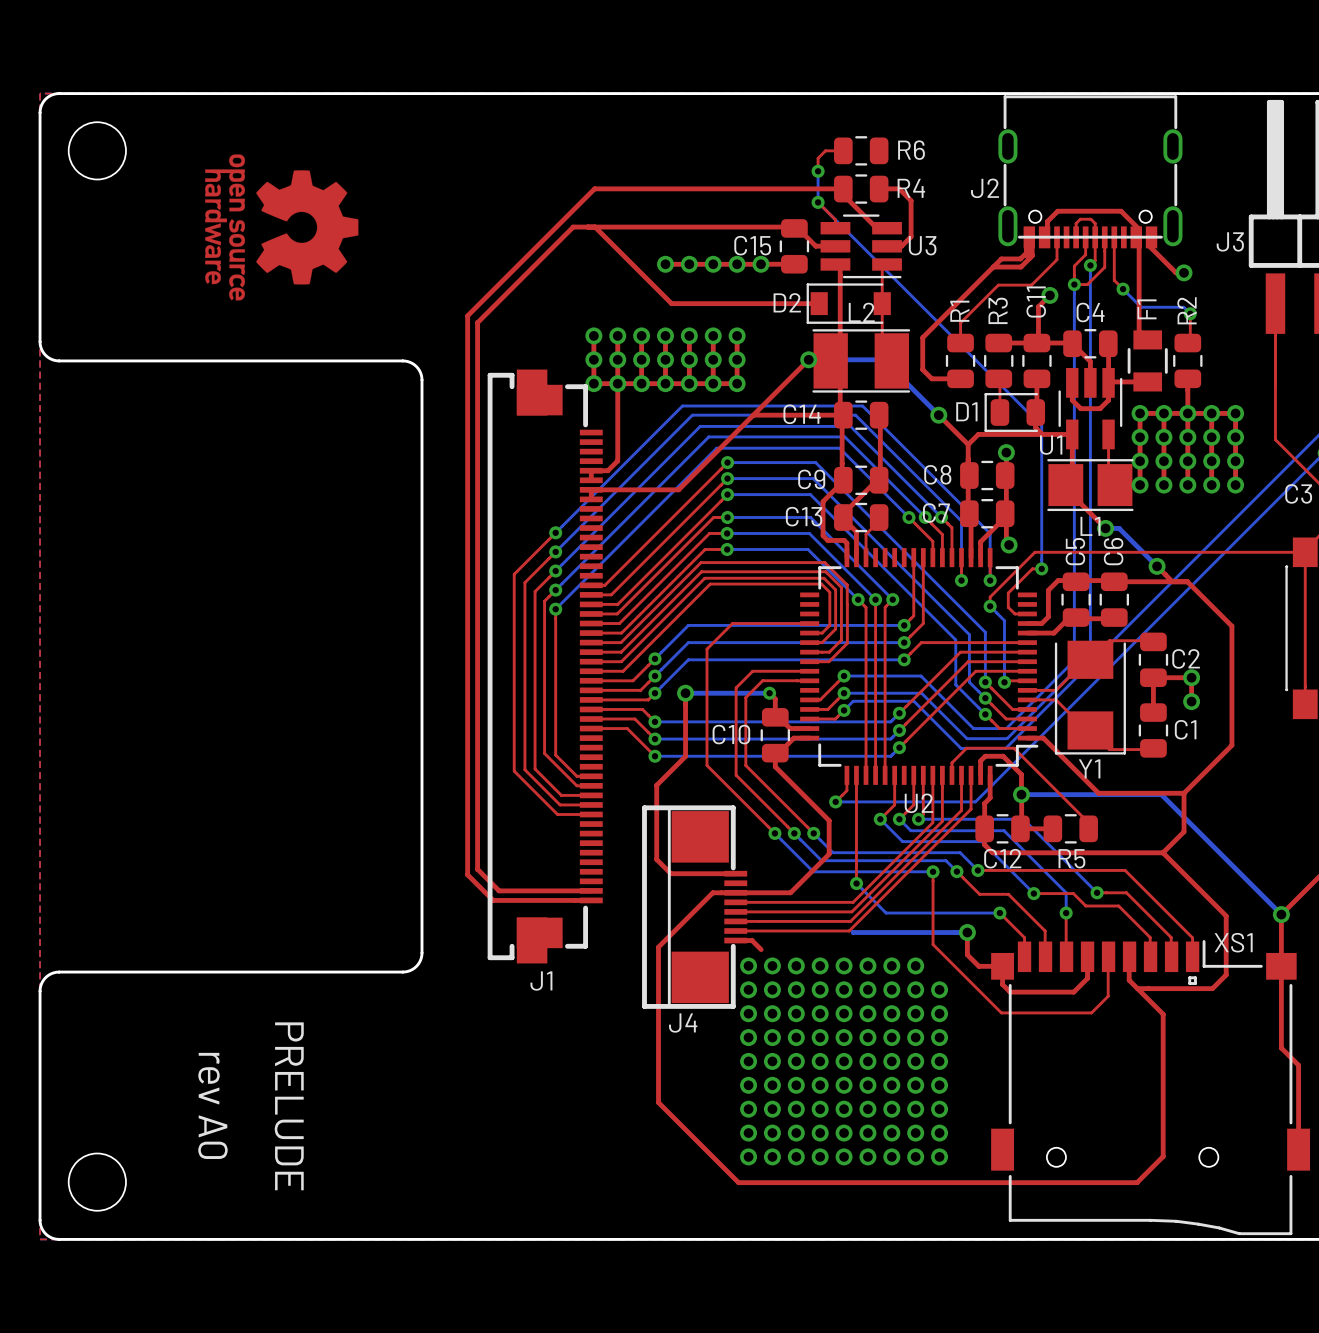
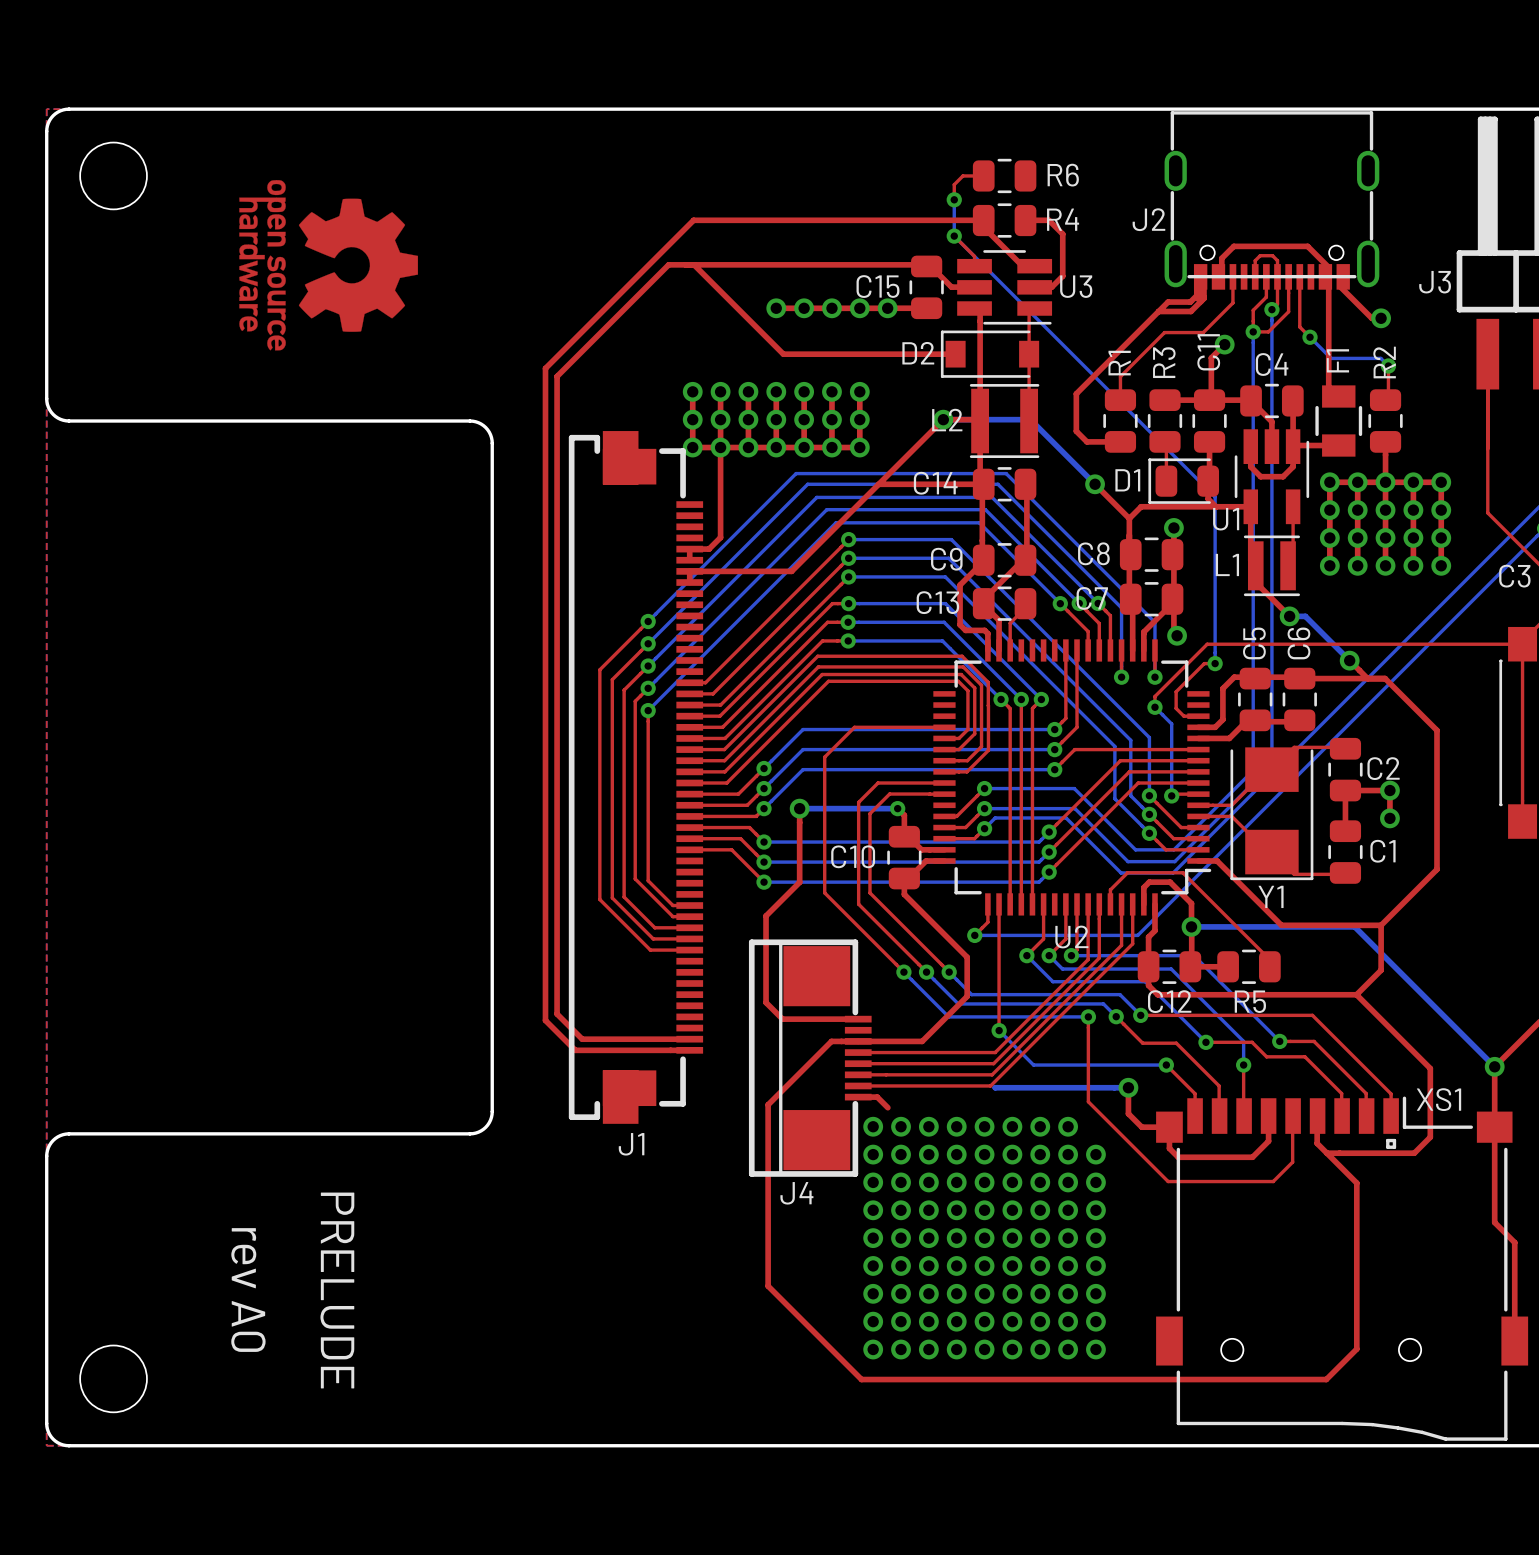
L2 name position: L2 (861, 312) -> L2 (947, 420)
L2 footprint: [812, 329, 911, 393] -> [969, 384, 1040, 458]
L1 footprint: [1047, 459, 1134, 512] -> [1243, 535, 1301, 597]
L1 name position: L1 (1090, 526) -> L1 (1227, 564)

